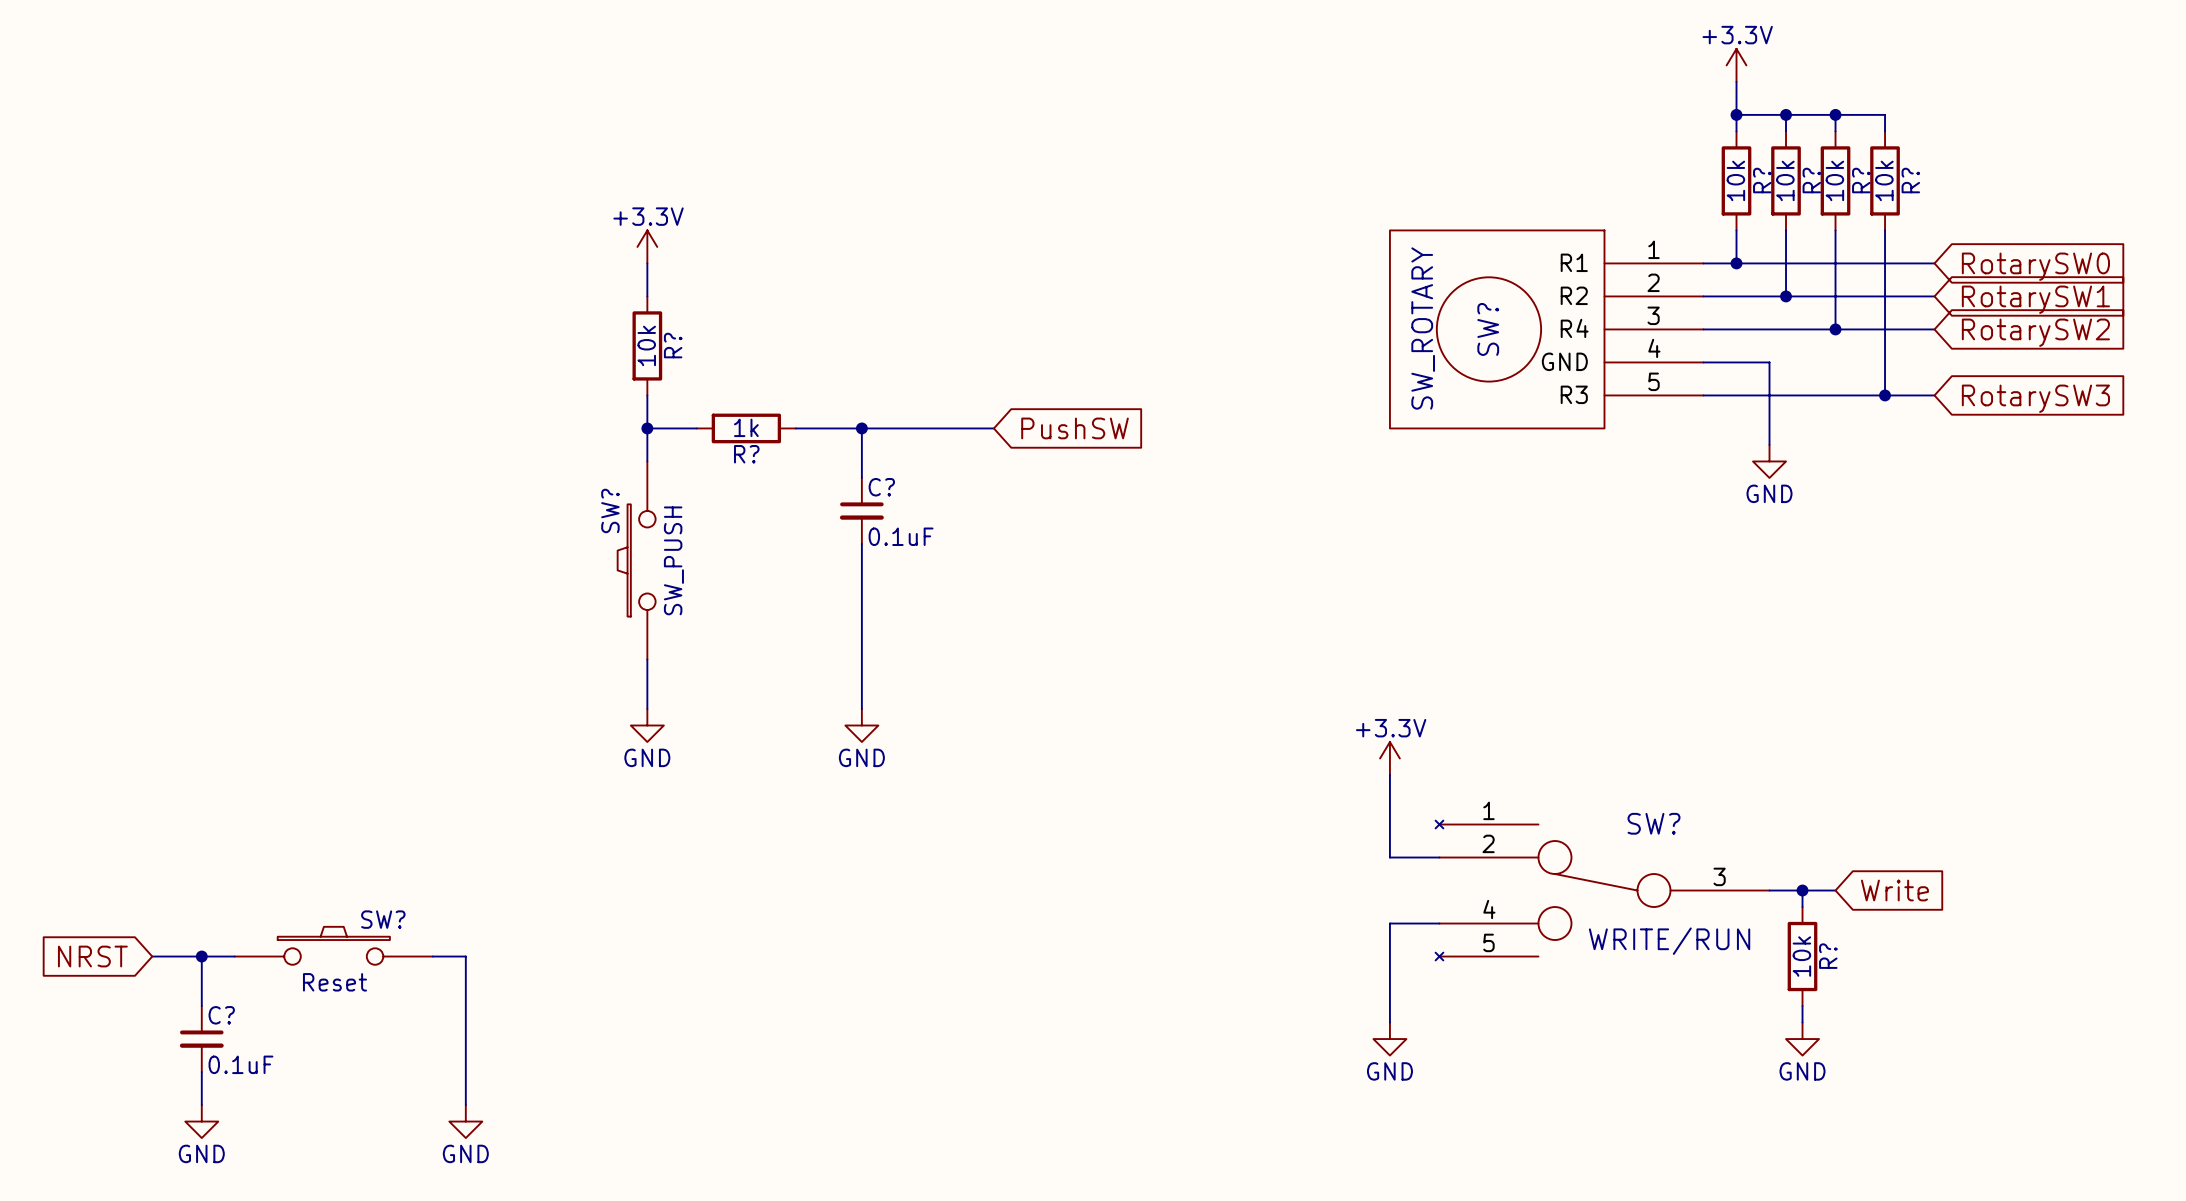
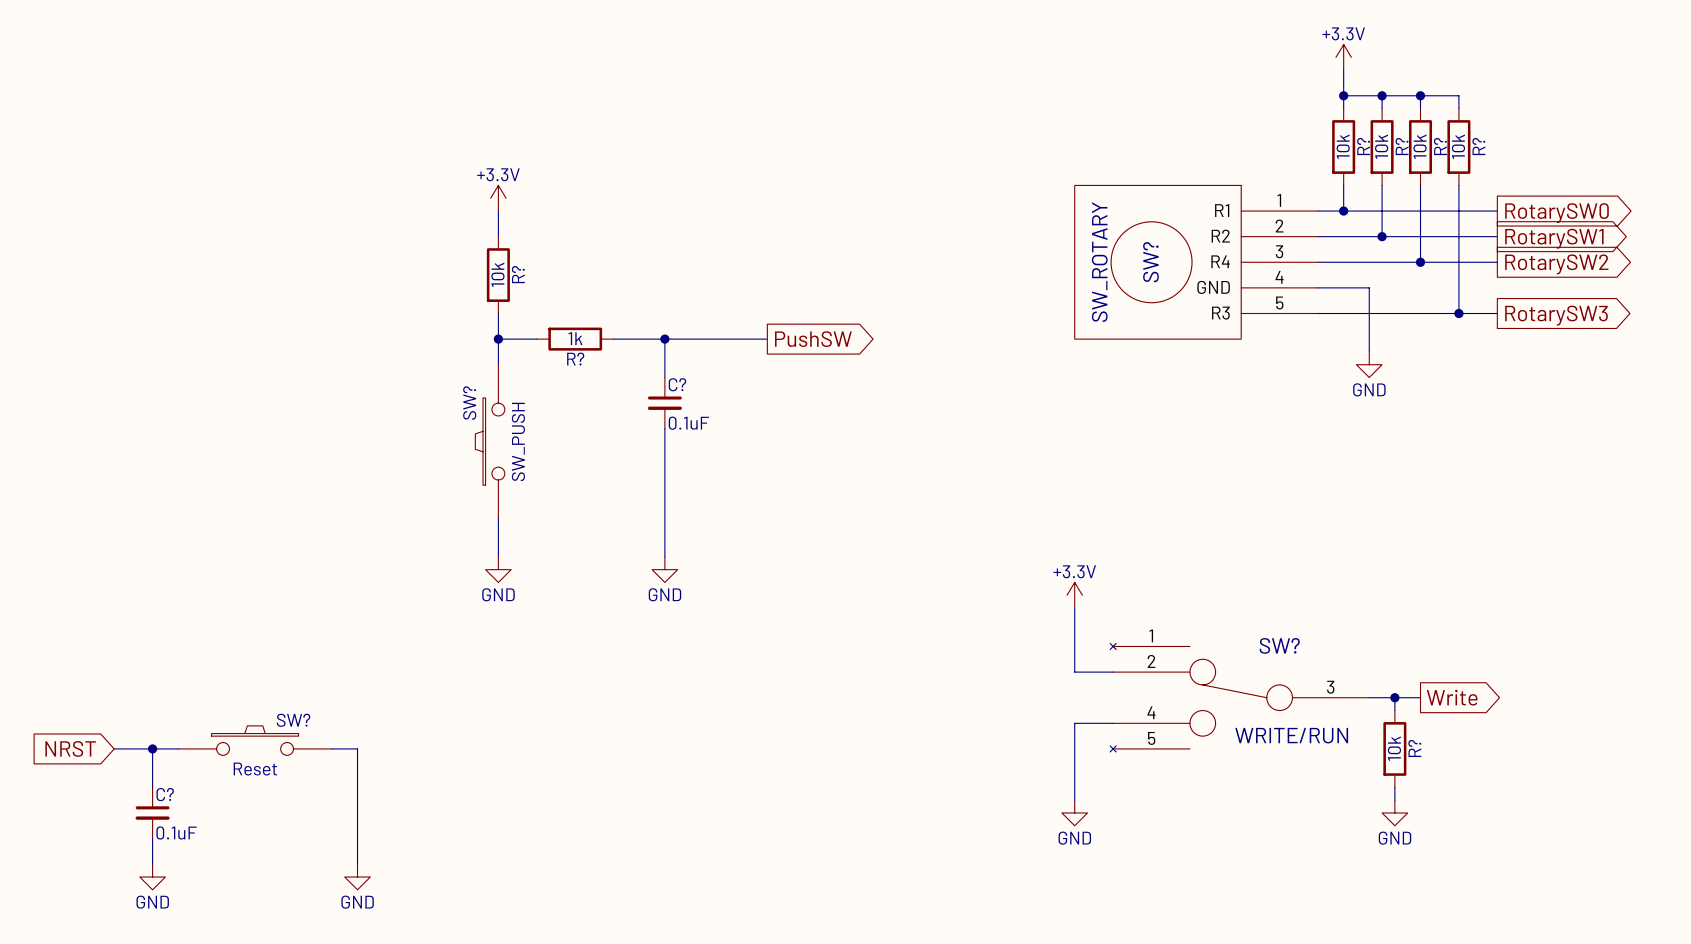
global label shape: input (2035, 266) -> output (1556, 213)
global label shape: input (2035, 299) -> output (1554, 238)
global label shape: input (2035, 332) -> output (1556, 264)
global label shape: input (2035, 398) -> output (1556, 315)
global label shape: input (1075, 428) -> output (813, 339)
global label shape: input (1894, 890) -> output (1452, 697)

